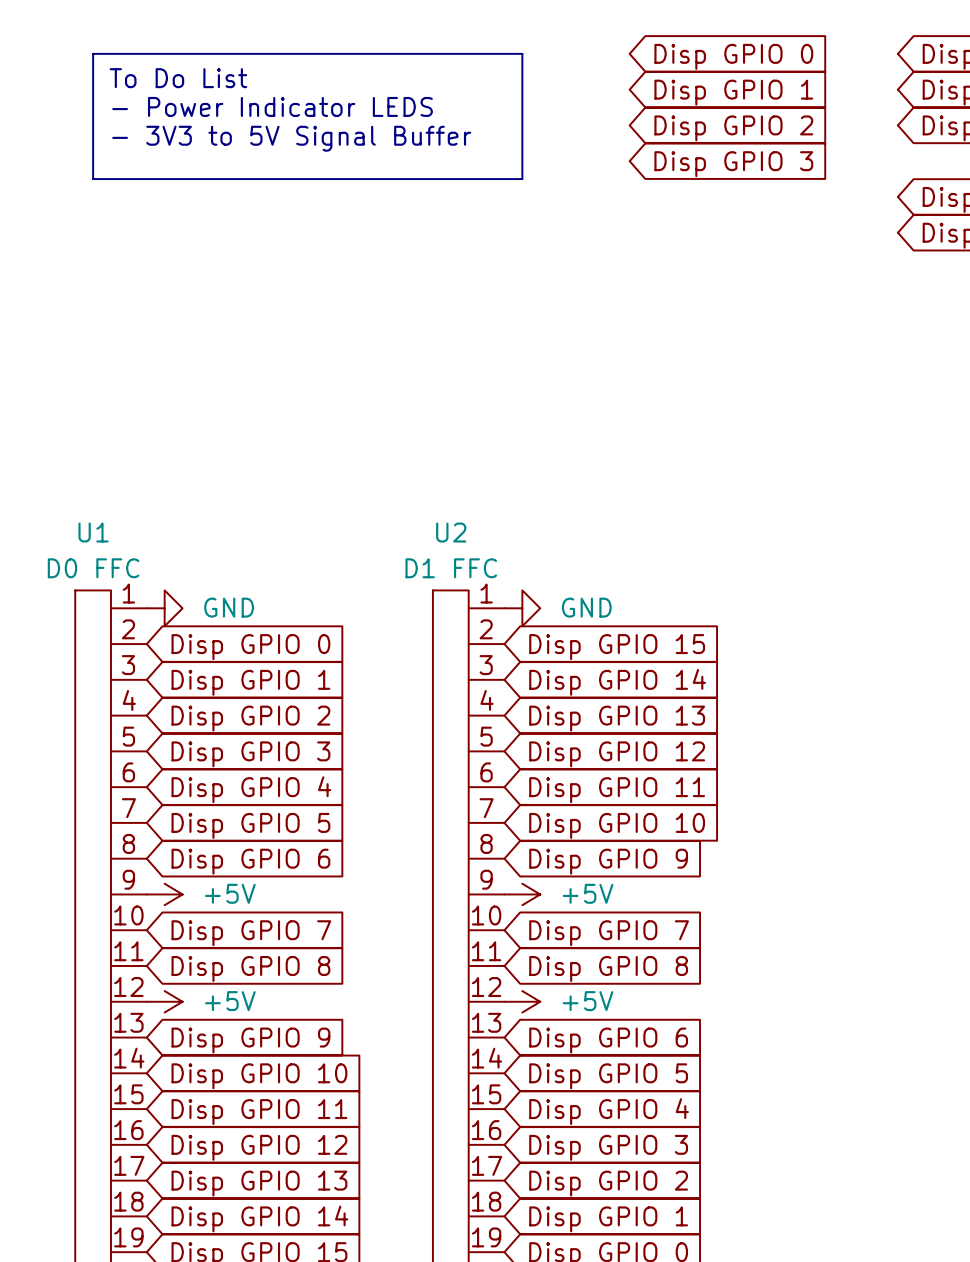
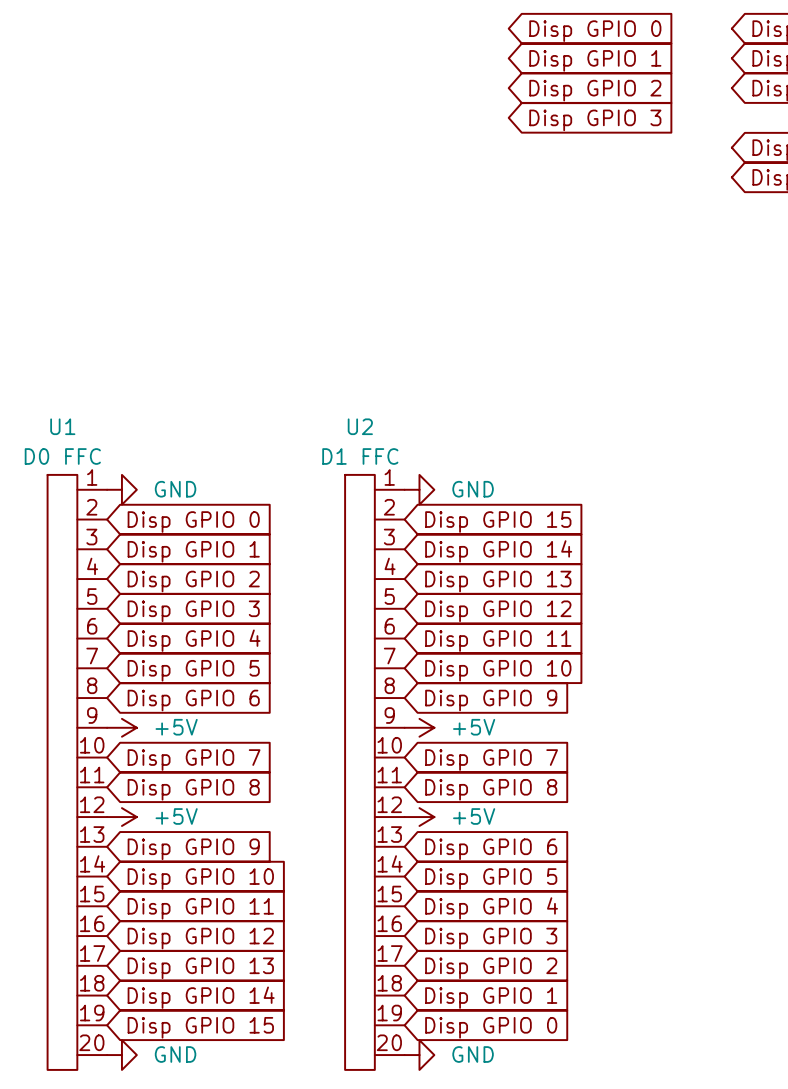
line: (93, 53) (522, 53) (522, 179) (93, 179) (93, 53) -> none
text: To Do List (178, 78) -> none
text: - Power Indicator LEDS (272, 106) -> none
text: - 3V3 to 5V Signal Buffer (291, 138) -> none

